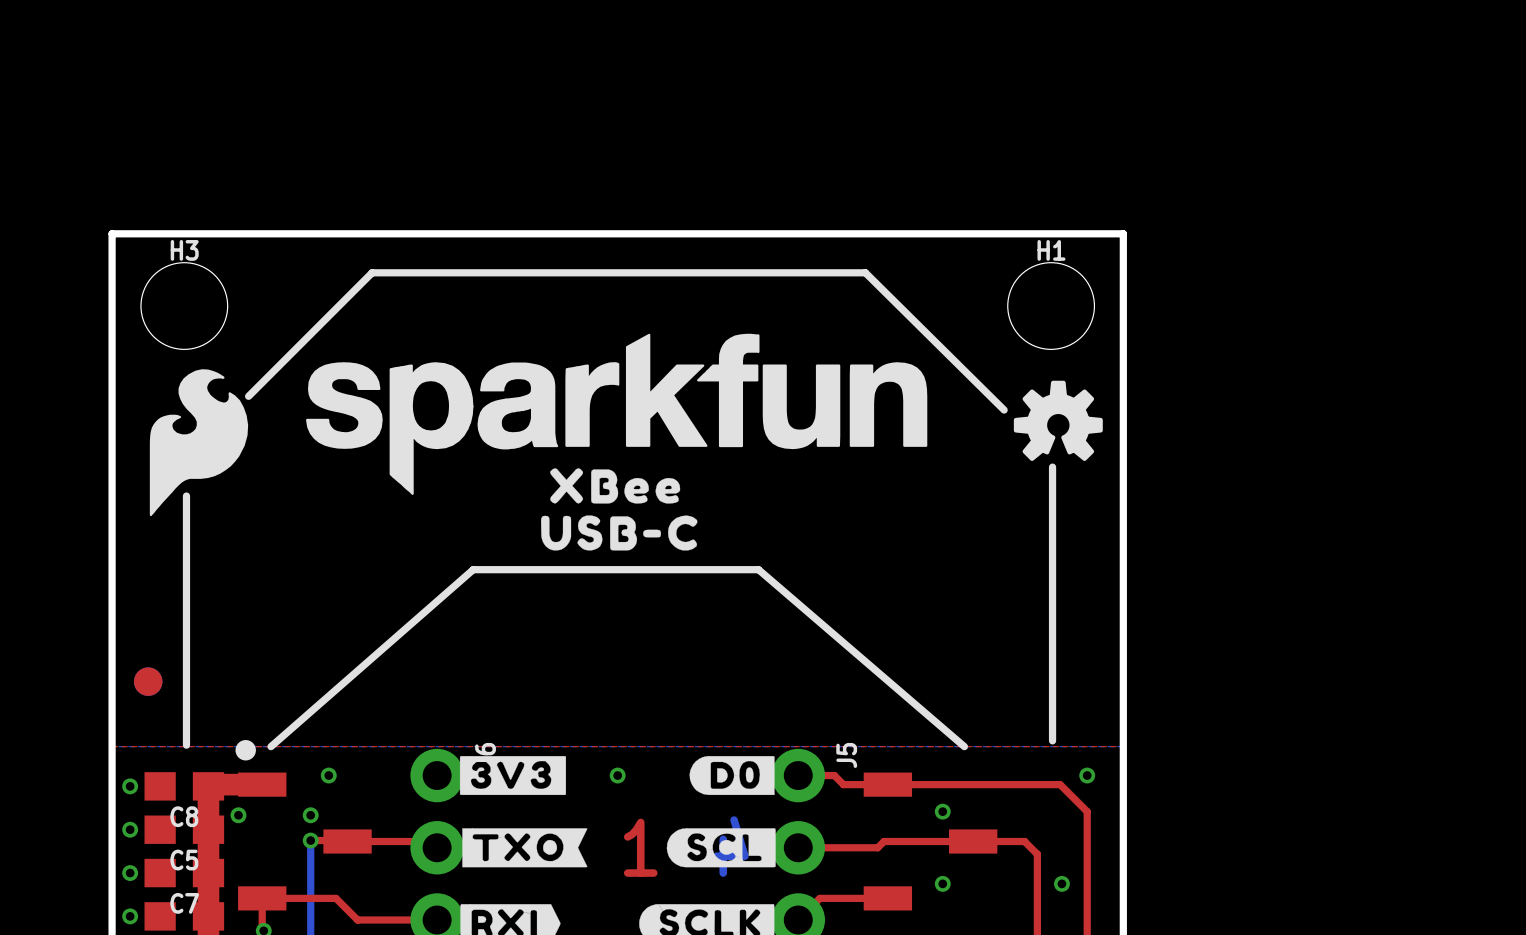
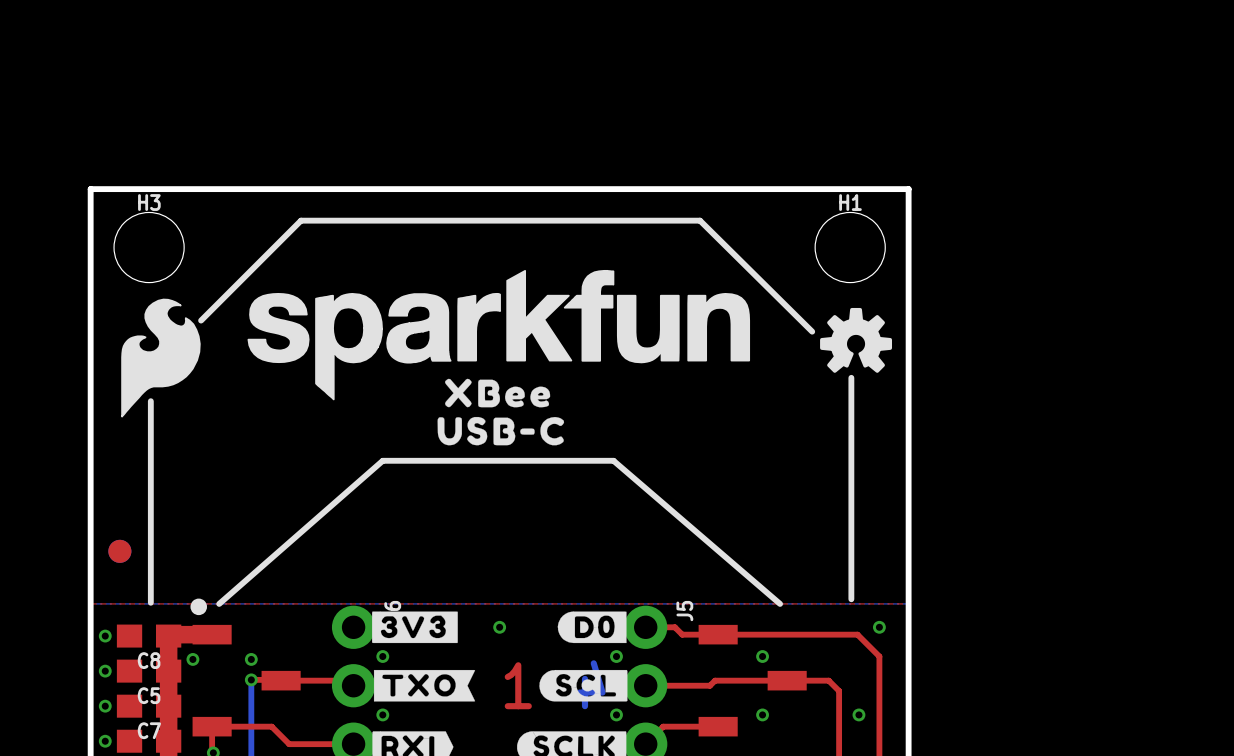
via: (328, 775) -> none
via: none -> (382, 656)
via: none -> (616, 656)
via: none -> (382, 714)
via: none -> (616, 714)

